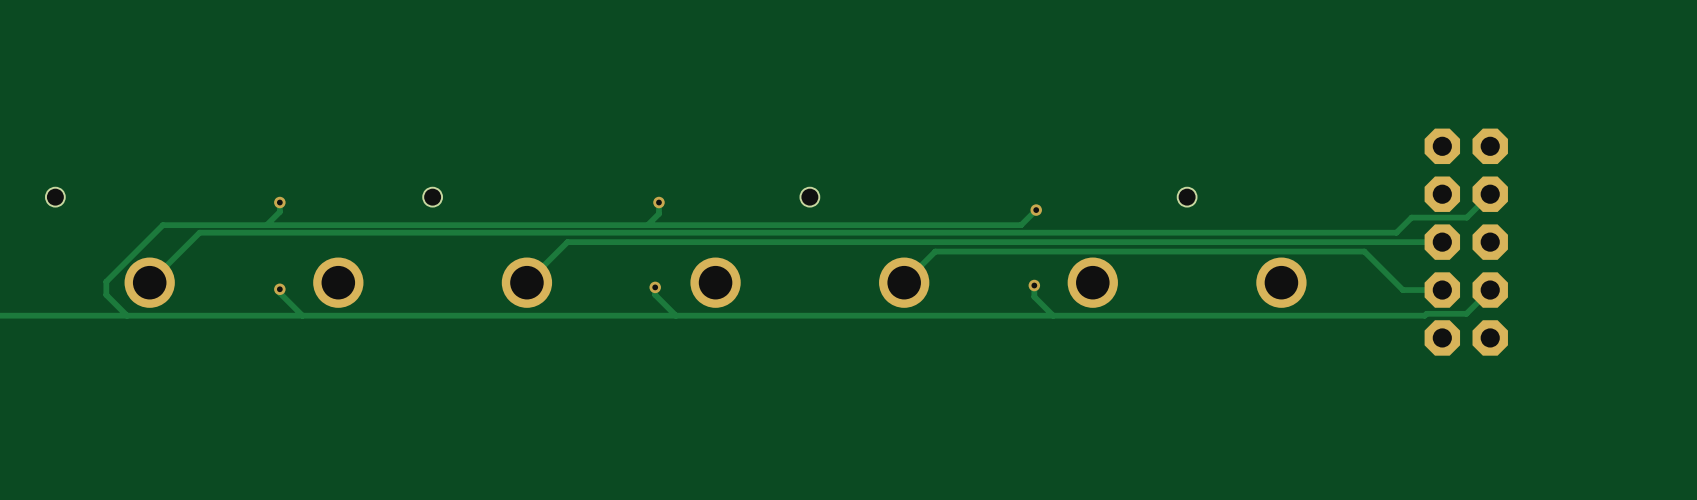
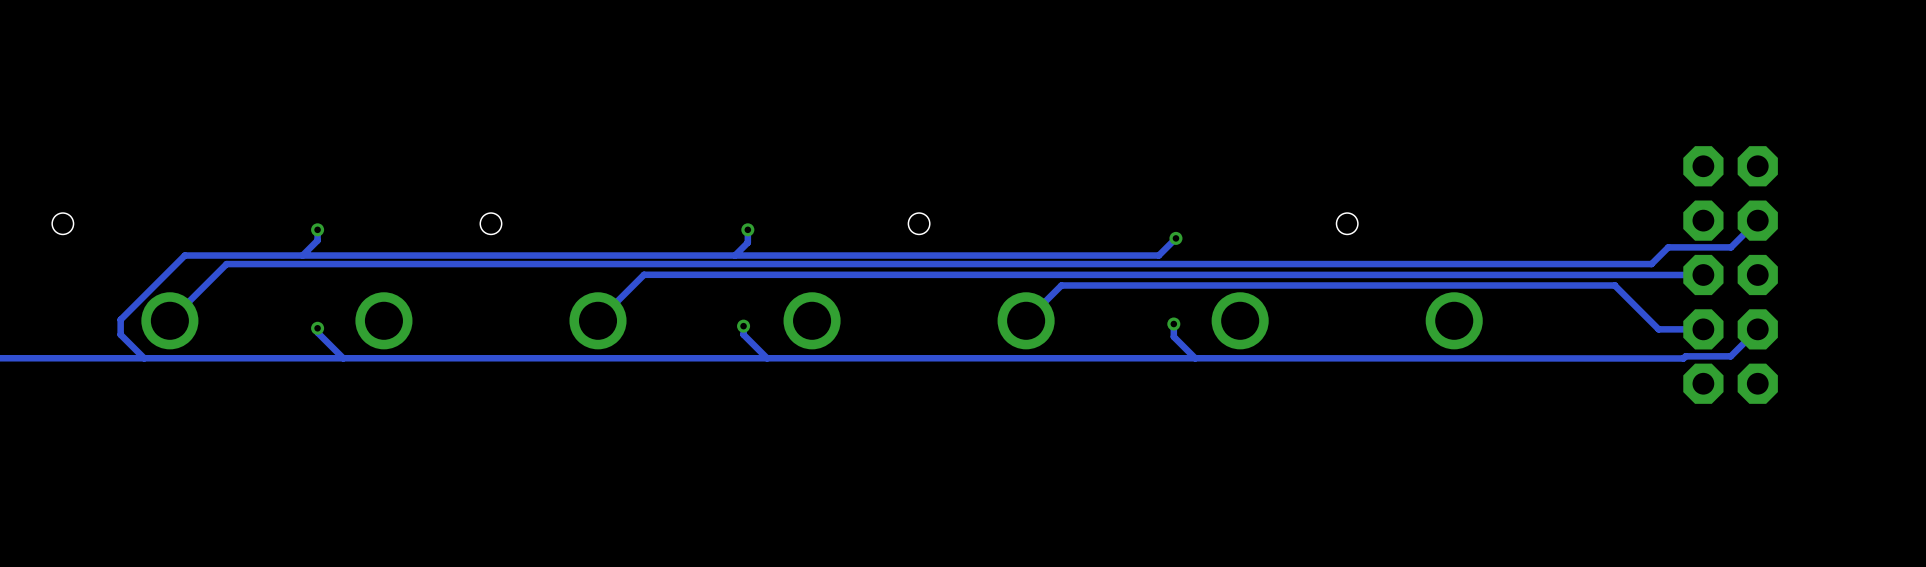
track: (1490, 194) (1466, 217) (1411, 217) (1396, 232) -> (1757, 220) (1731, 247) (1668, 247) (1651, 264) (1584, 264)
track: (1442, 242) (567, 242) -> (1703, 274) (644, 274)
part position: (1466, 242) -> (1730, 274)
track: (1364, 251) (1402, 290) (1442, 290) -> (1548, 285) (1614, 285)
track: none -> (1614, 285) (1658, 329) (1703, 329)
track: (1490, 290) (1466, 313) (1426, 313) (1424, 315) (1053, 315) -> (1757, 329) (1730, 356) (1685, 356) (1683, 358) (1195, 358)

